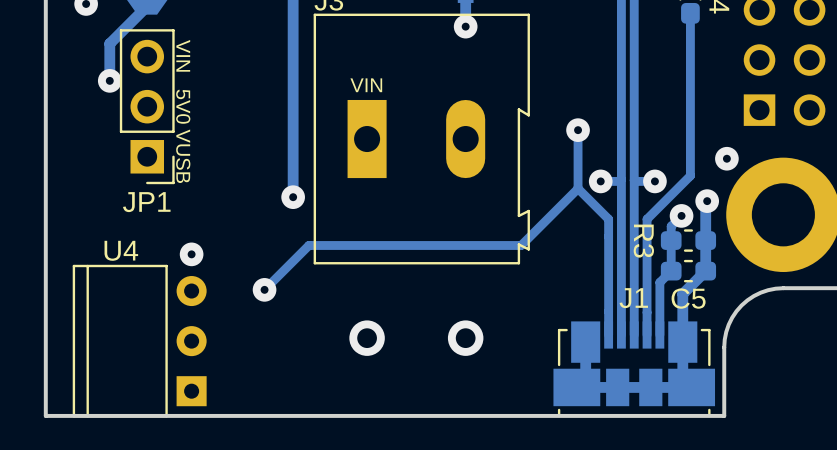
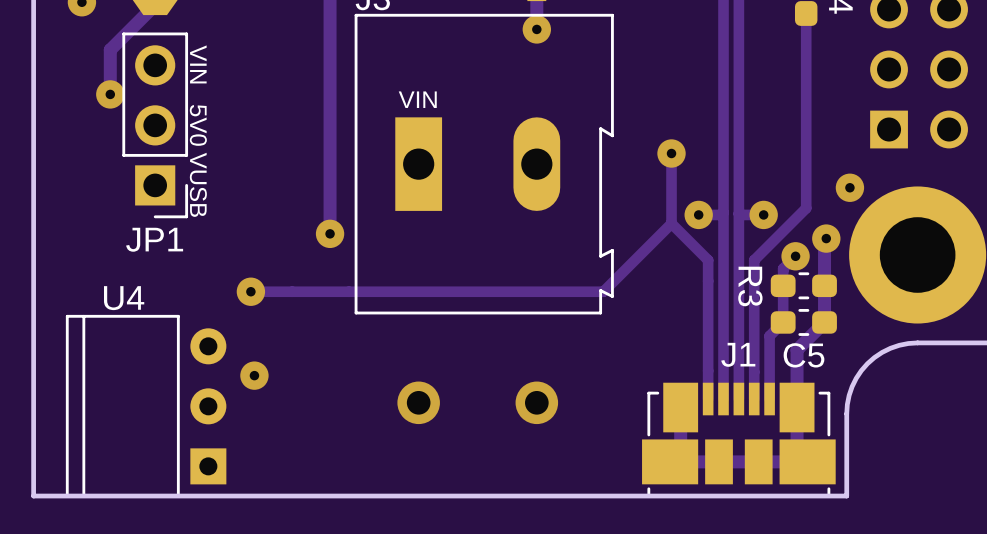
via: none -> (250, 291)
track: (308, 245) (264, 289) -> (348, 291) (250, 291)
via: (191, 254) -> none
via: (264, 289) -> none
via: none -> (254, 375)

